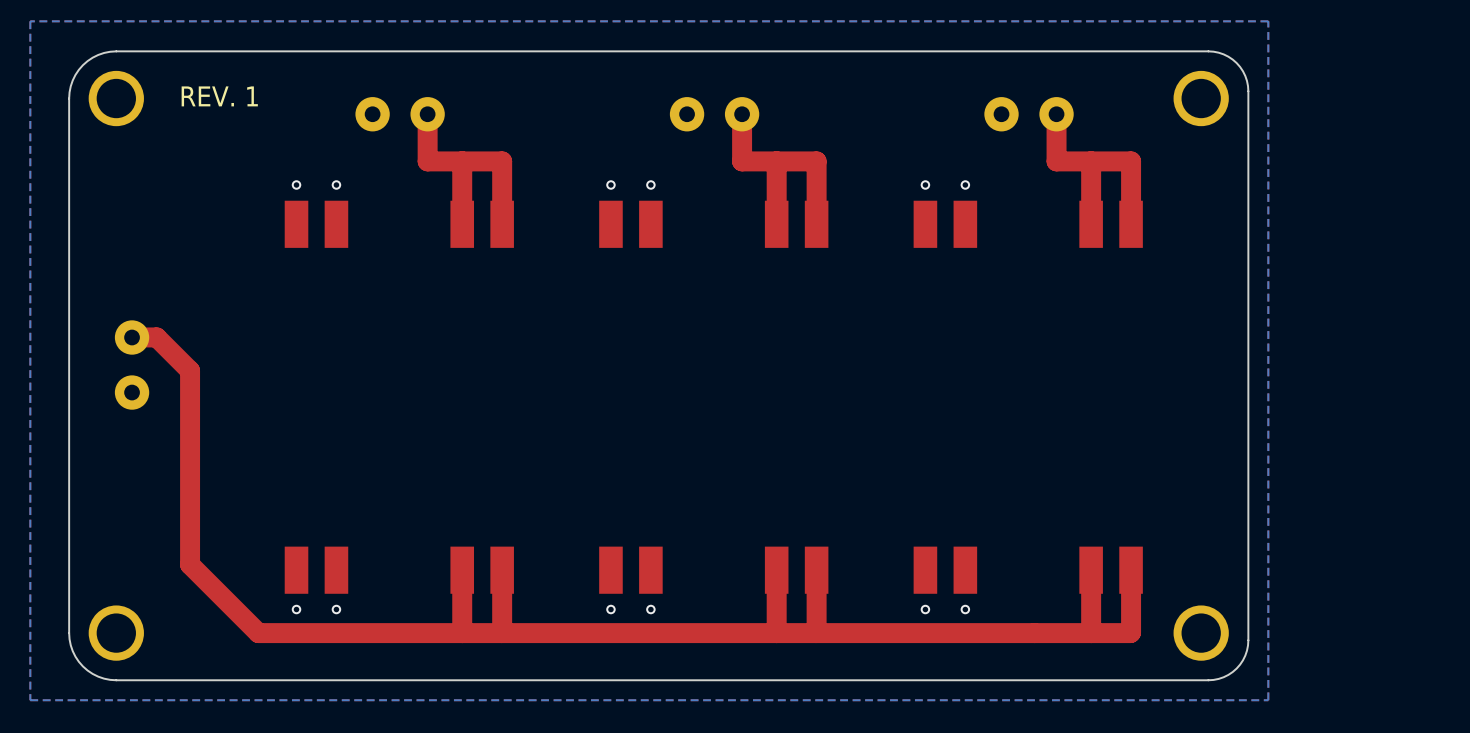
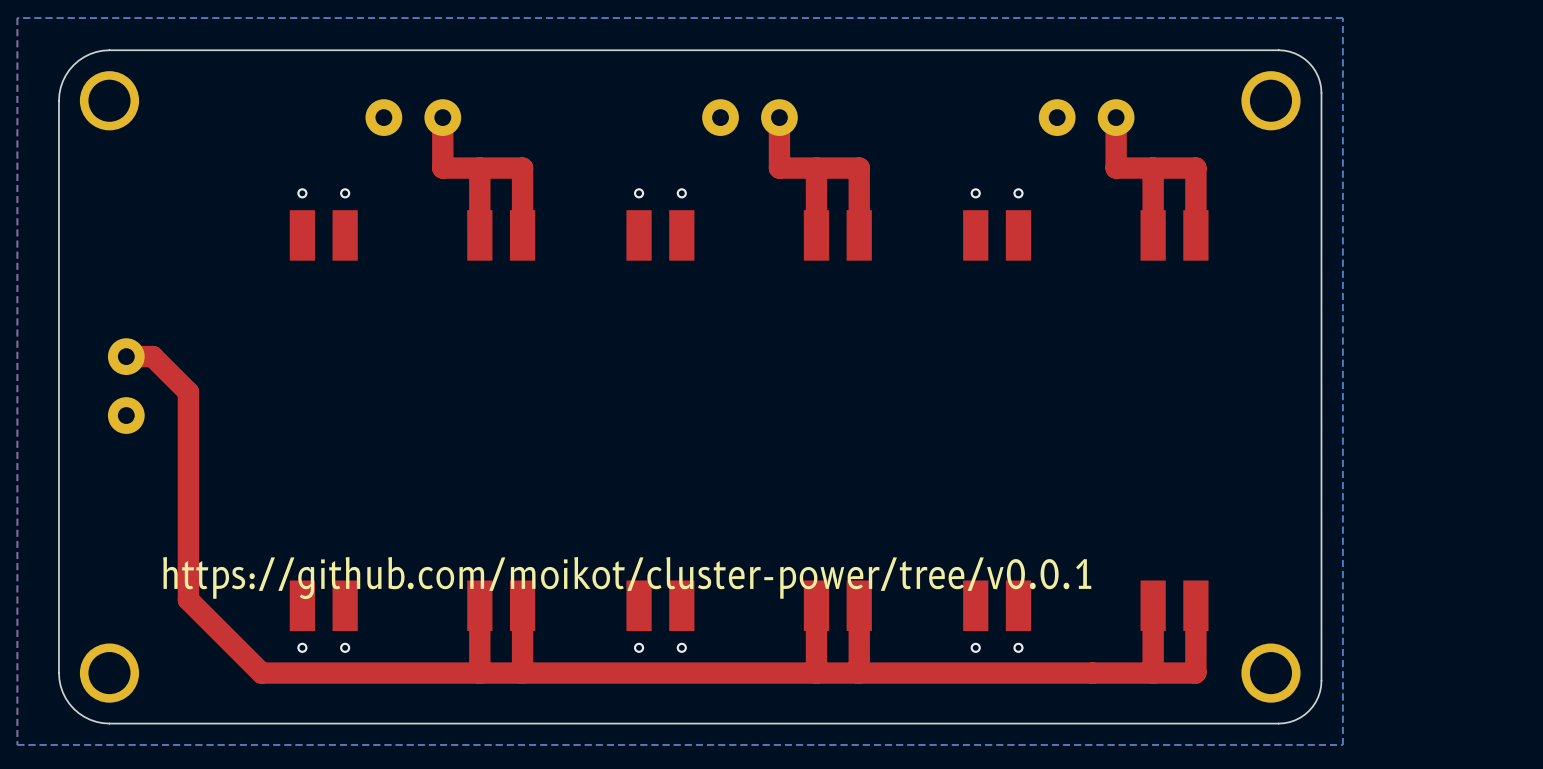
text: REV. 1 (219, 96) -> none
text: none -> https://github.com/moikot/cluster-power/tree/v0.0.1 (627, 578)

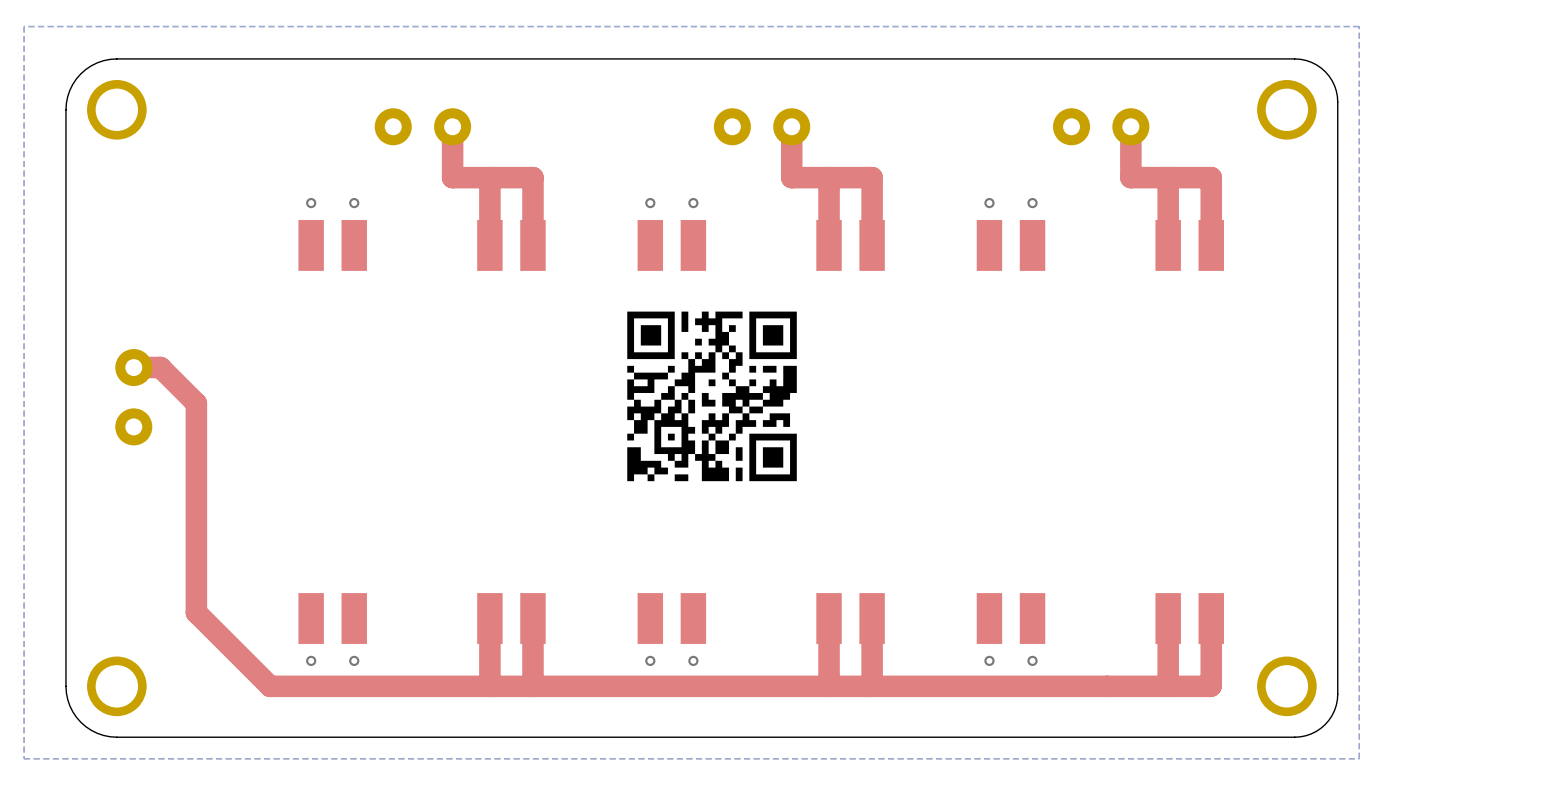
drawing: none -> [627, 311, 797, 482]
text: https://github.com/moikot/cluster-power/tree/v0.0.1 (627, 578) -> none

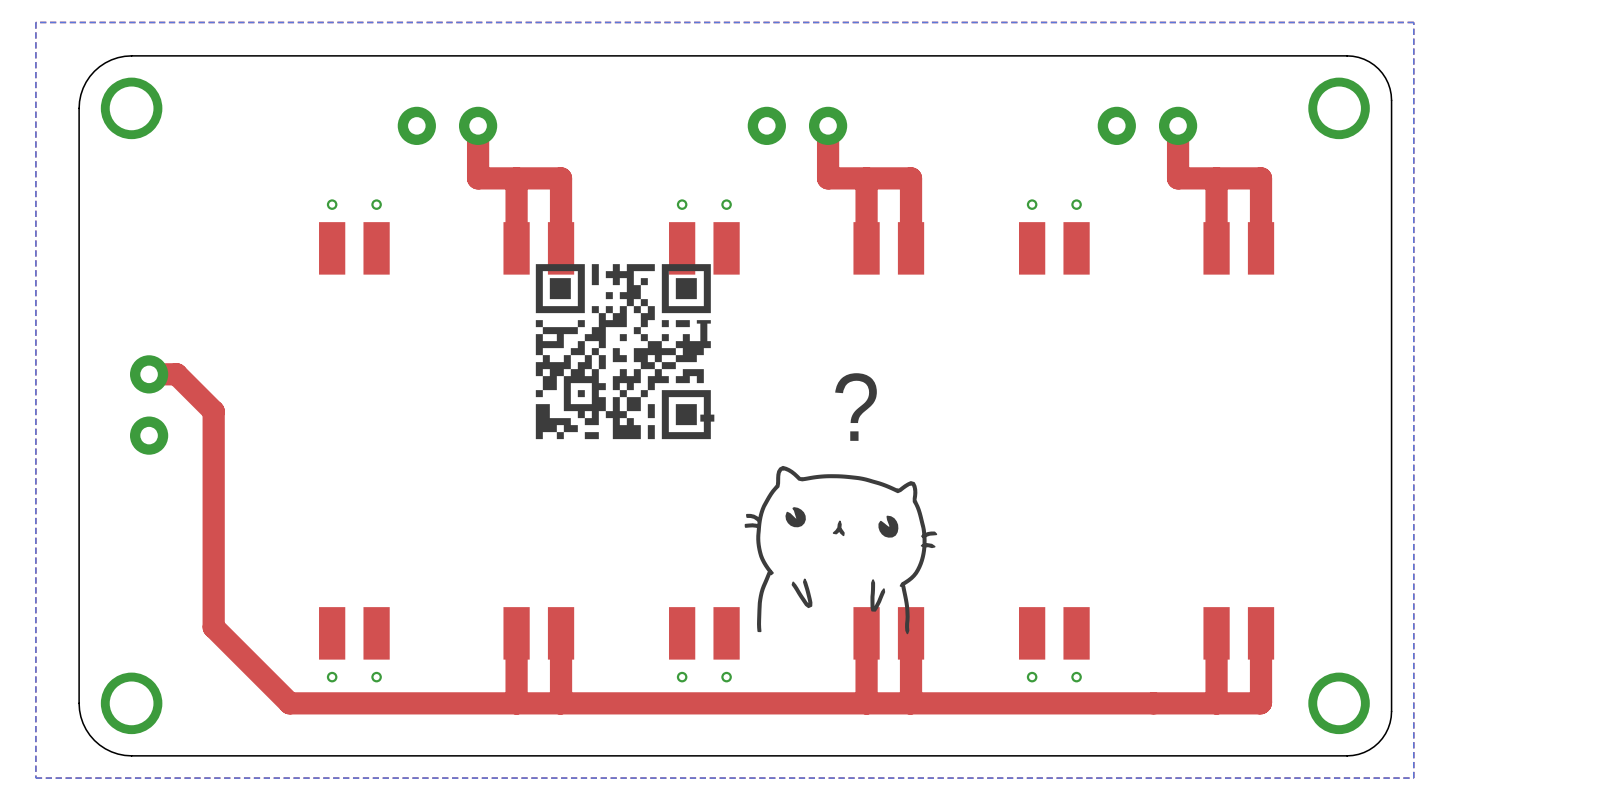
drawing: none -> [535, 264, 711, 440]
drawing: [627, 311, 797, 482] -> none
drawing shape: [627, 314, 675, 319] -> [675, 320, 690, 324]
drawing shape: [634, 372, 668, 377] -> [675, 379, 690, 384]
text: none -> ? (856, 407)
drawing: none -> [744, 465, 938, 635]

